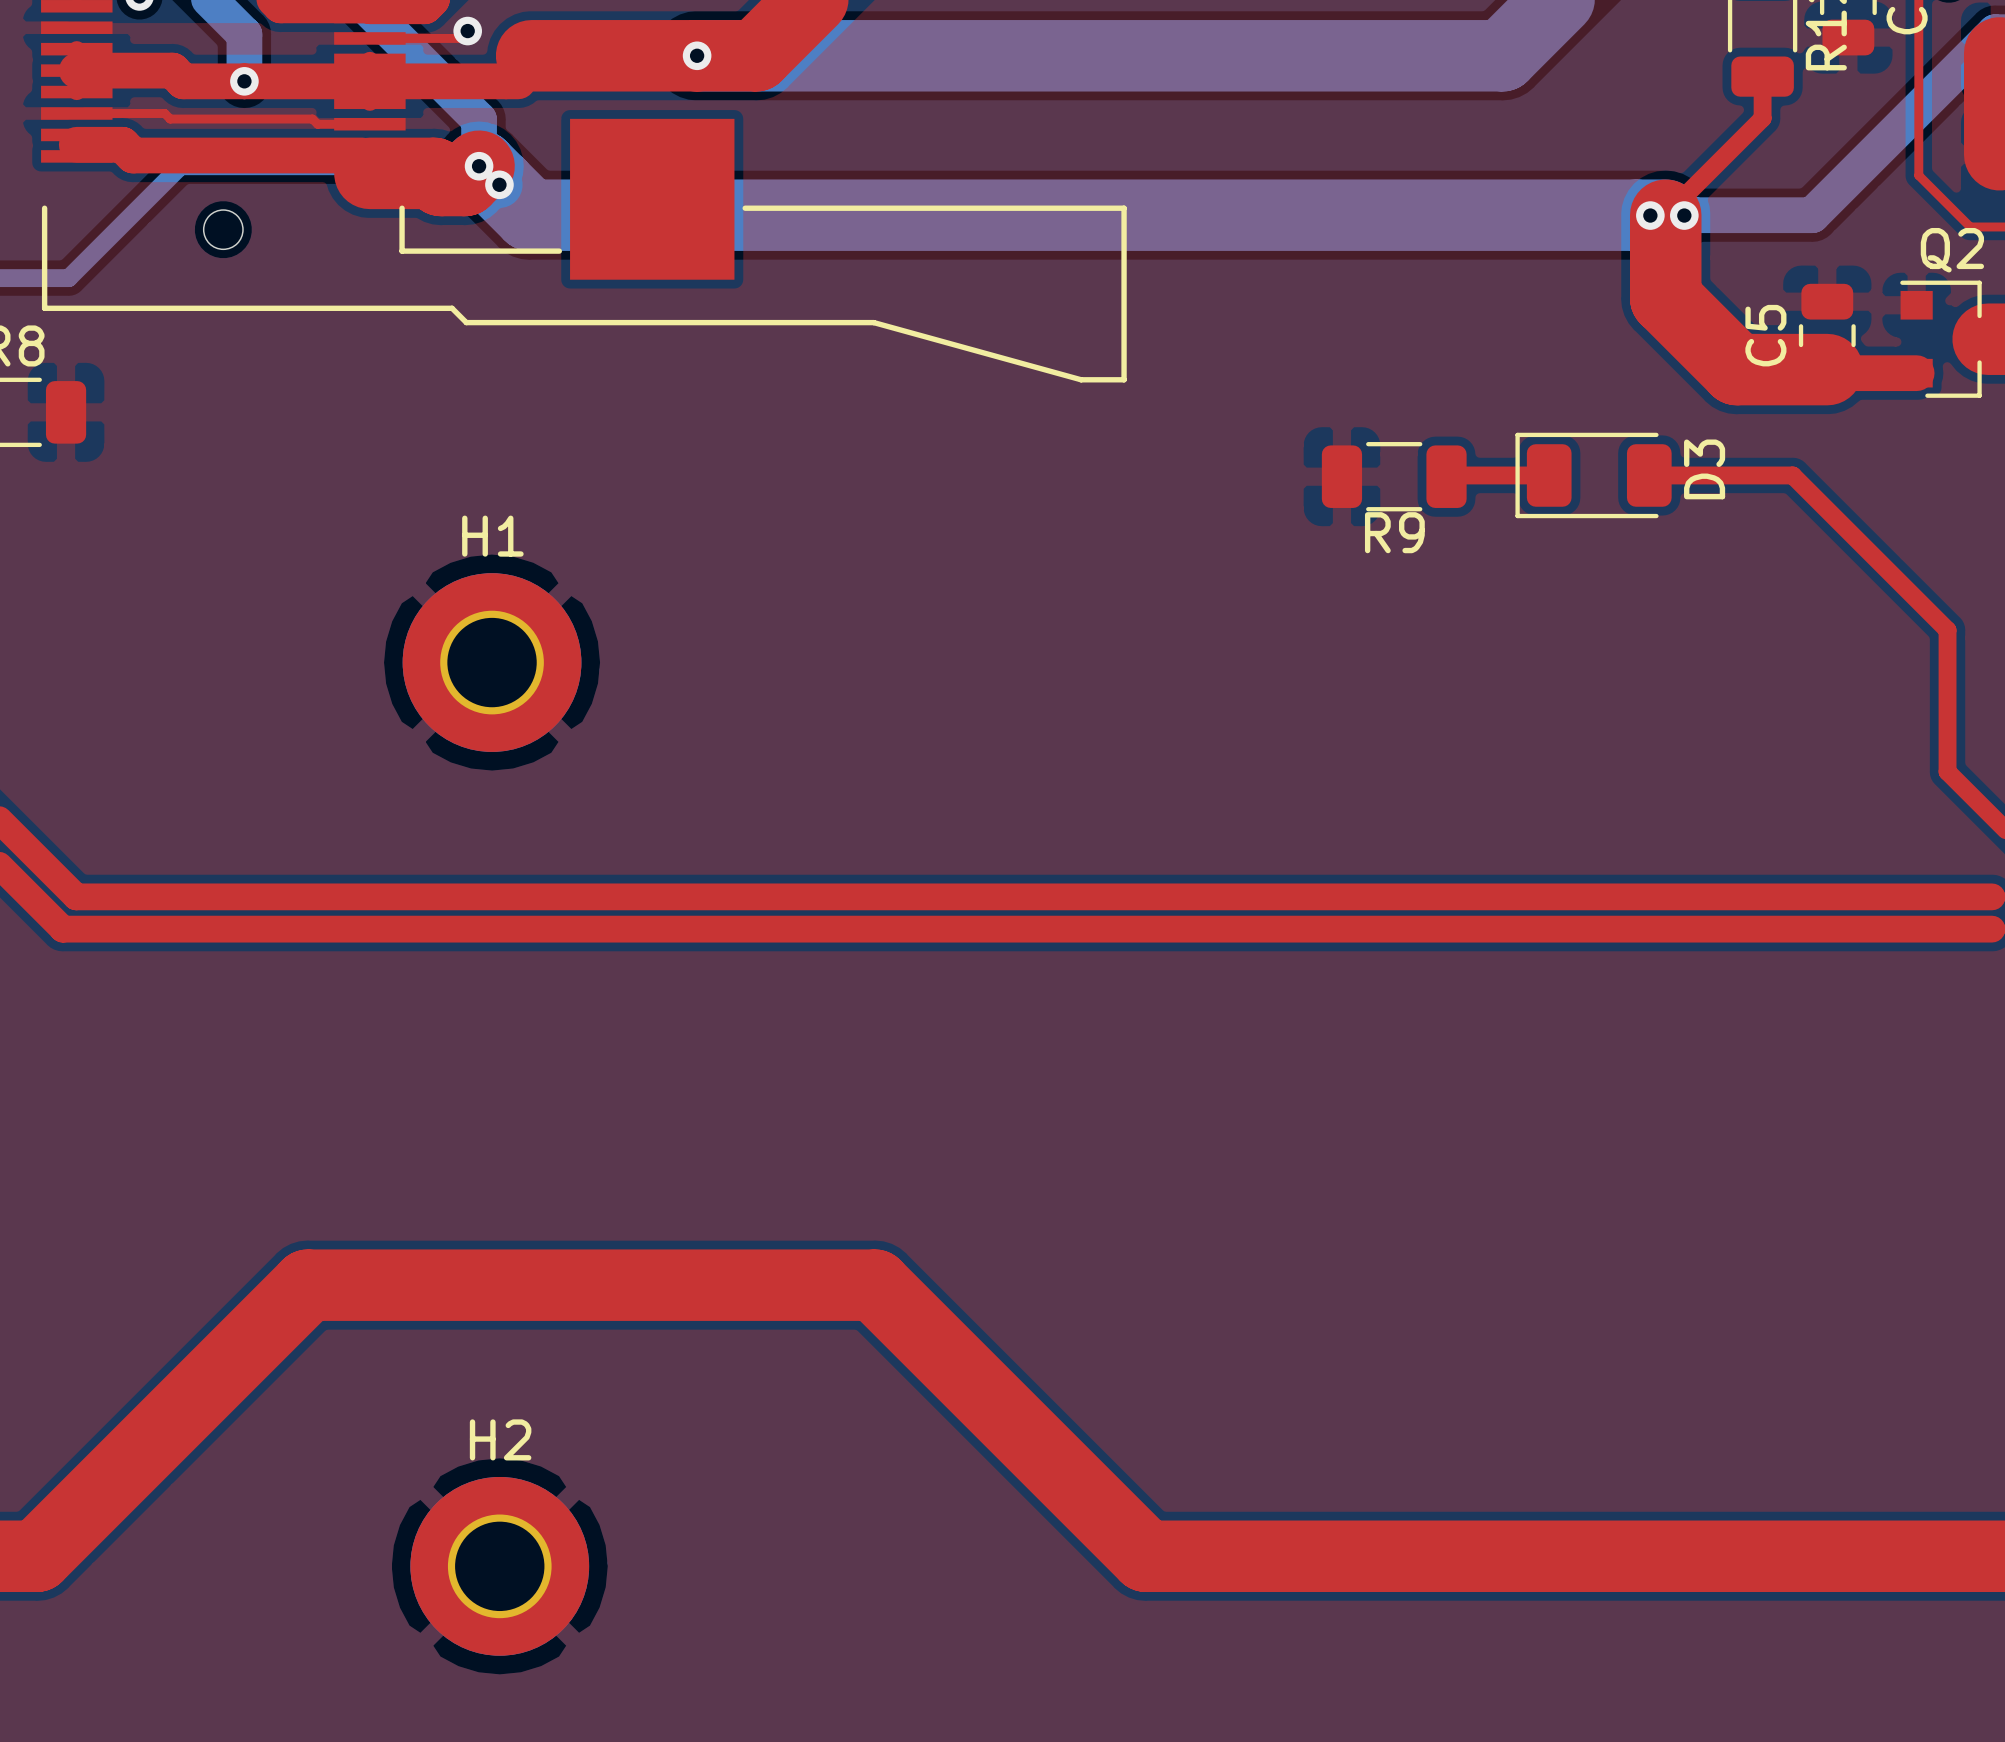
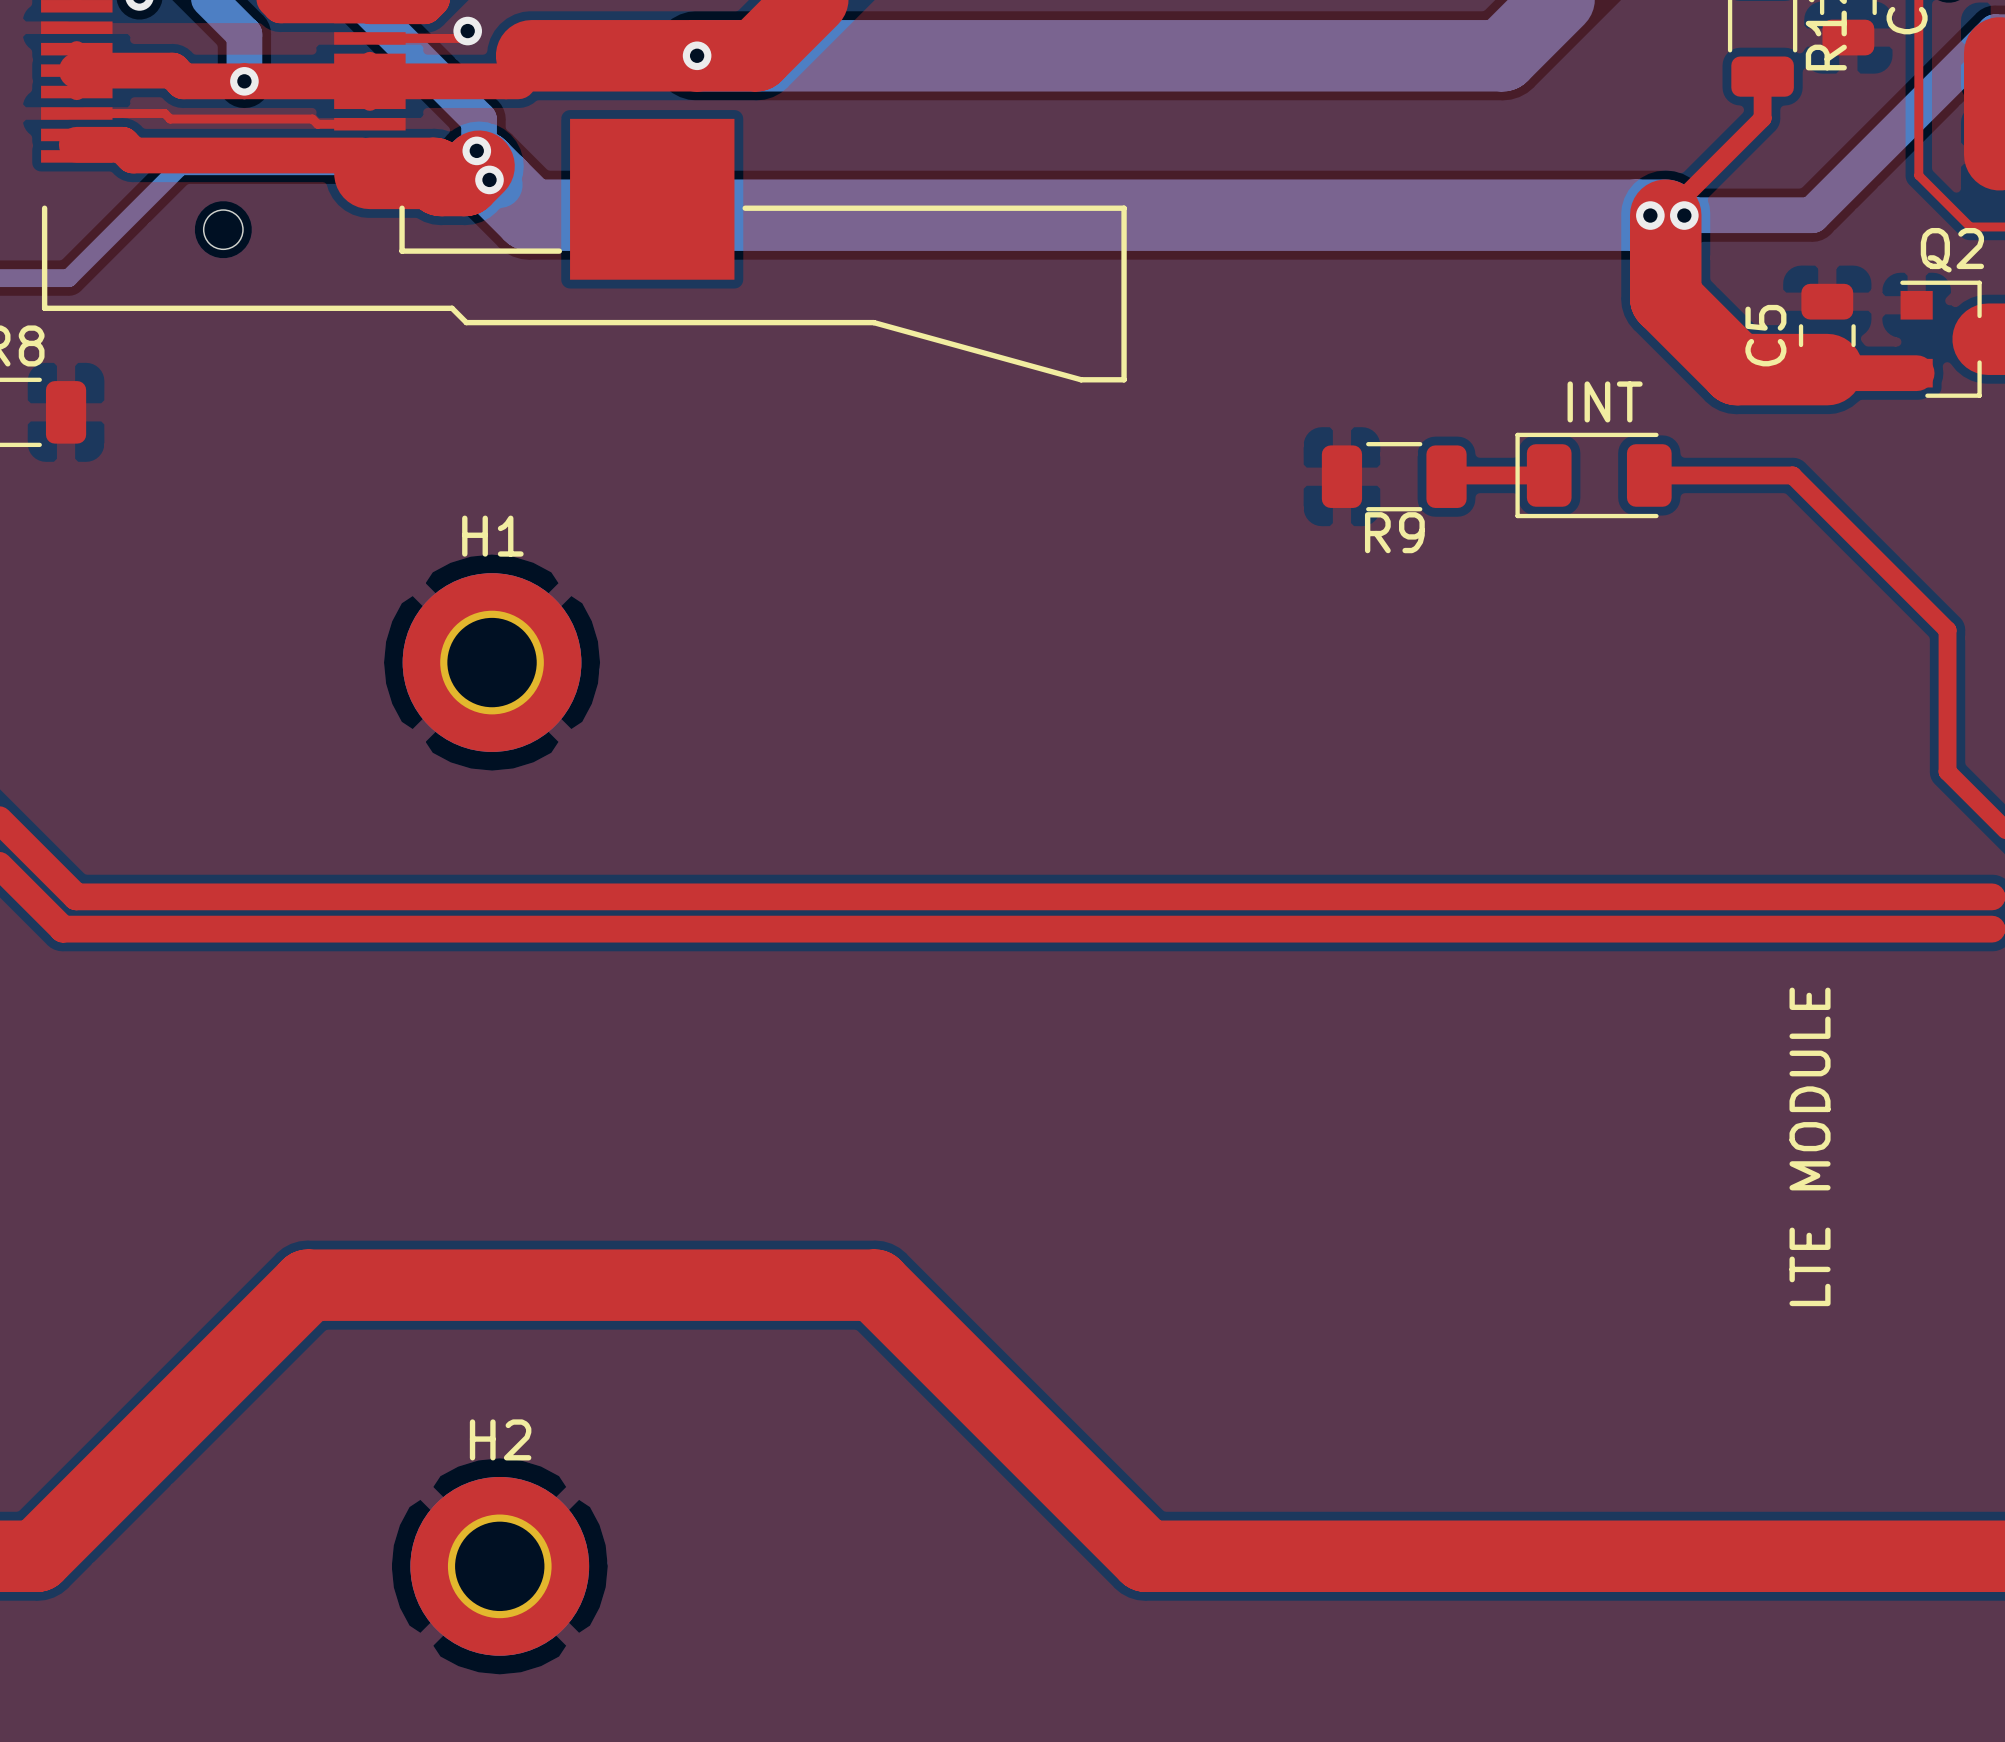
via: none -> (476, 150)
via: (479, 166) -> none
via: none -> (489, 179)
via: (499, 184) -> none
D3 name: D3 (1704, 469) -> INT (1605, 401)
text: none -> LTE MODULE (1810, 1146)

